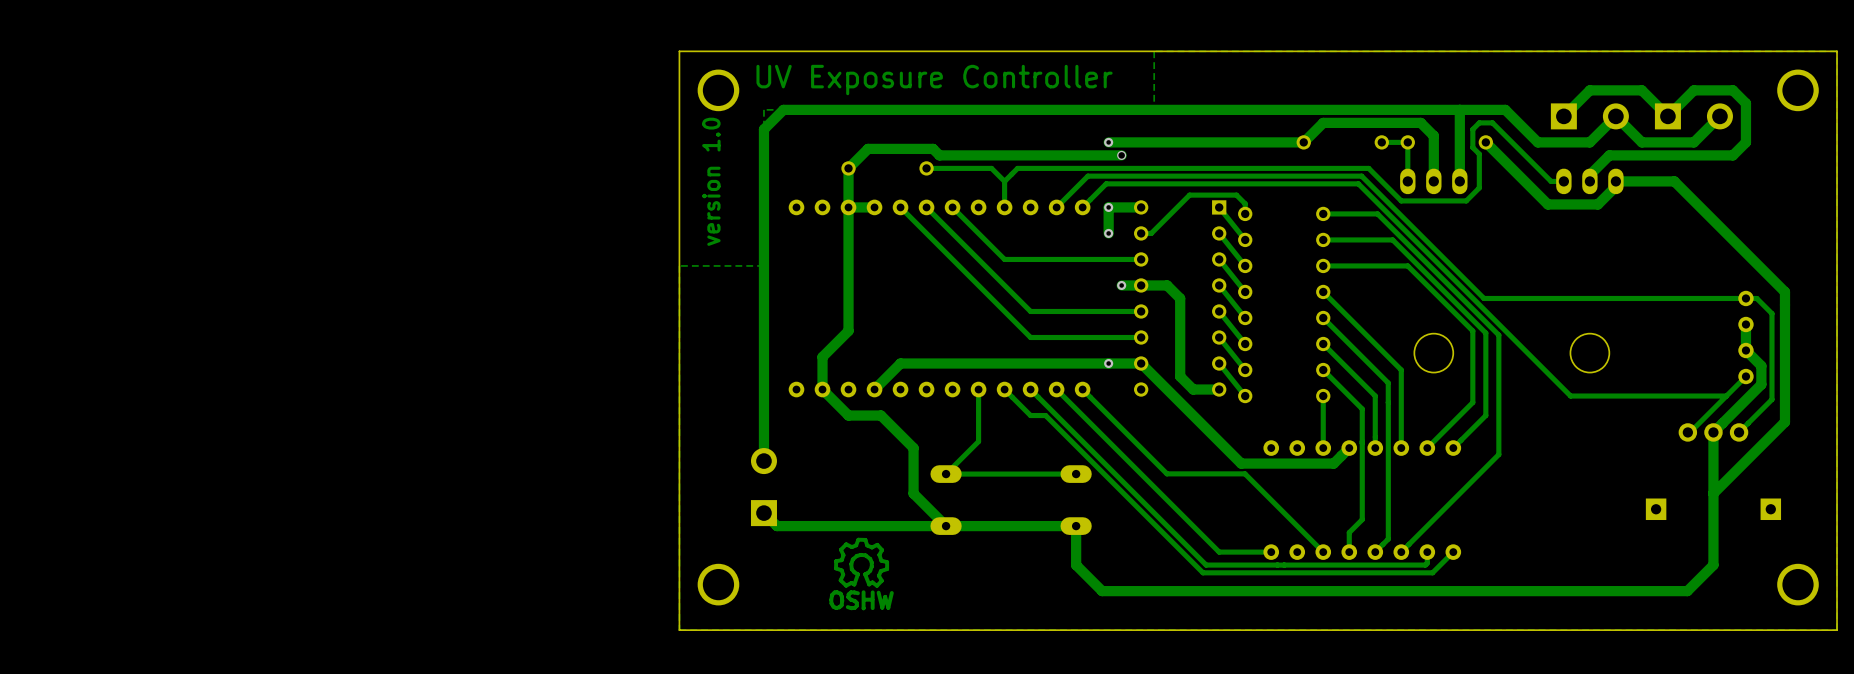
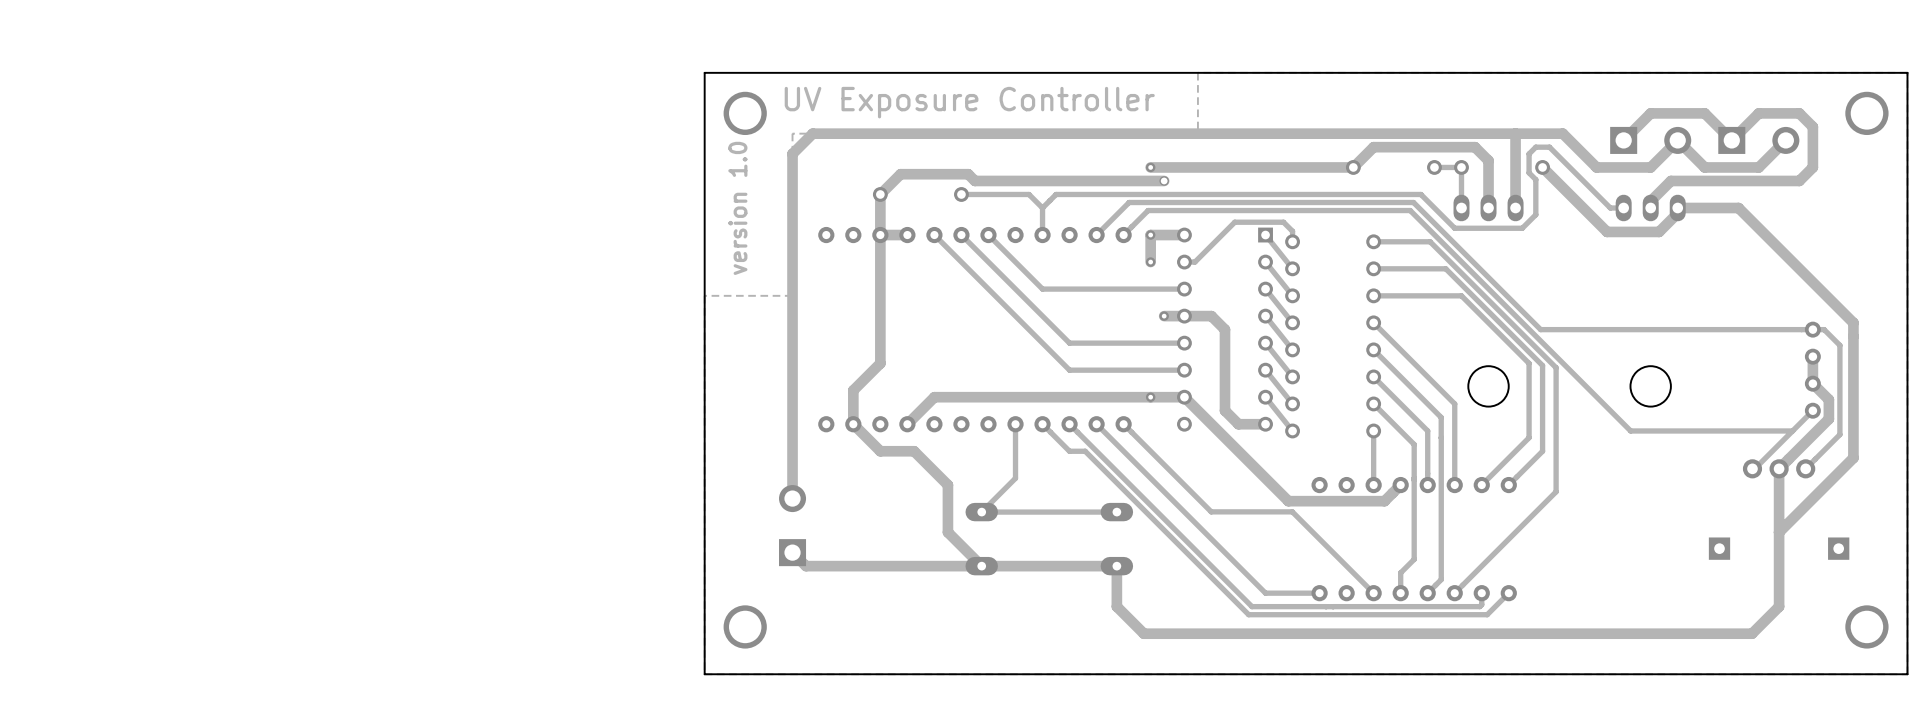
drawing: [829, 537, 894, 611] -> none

